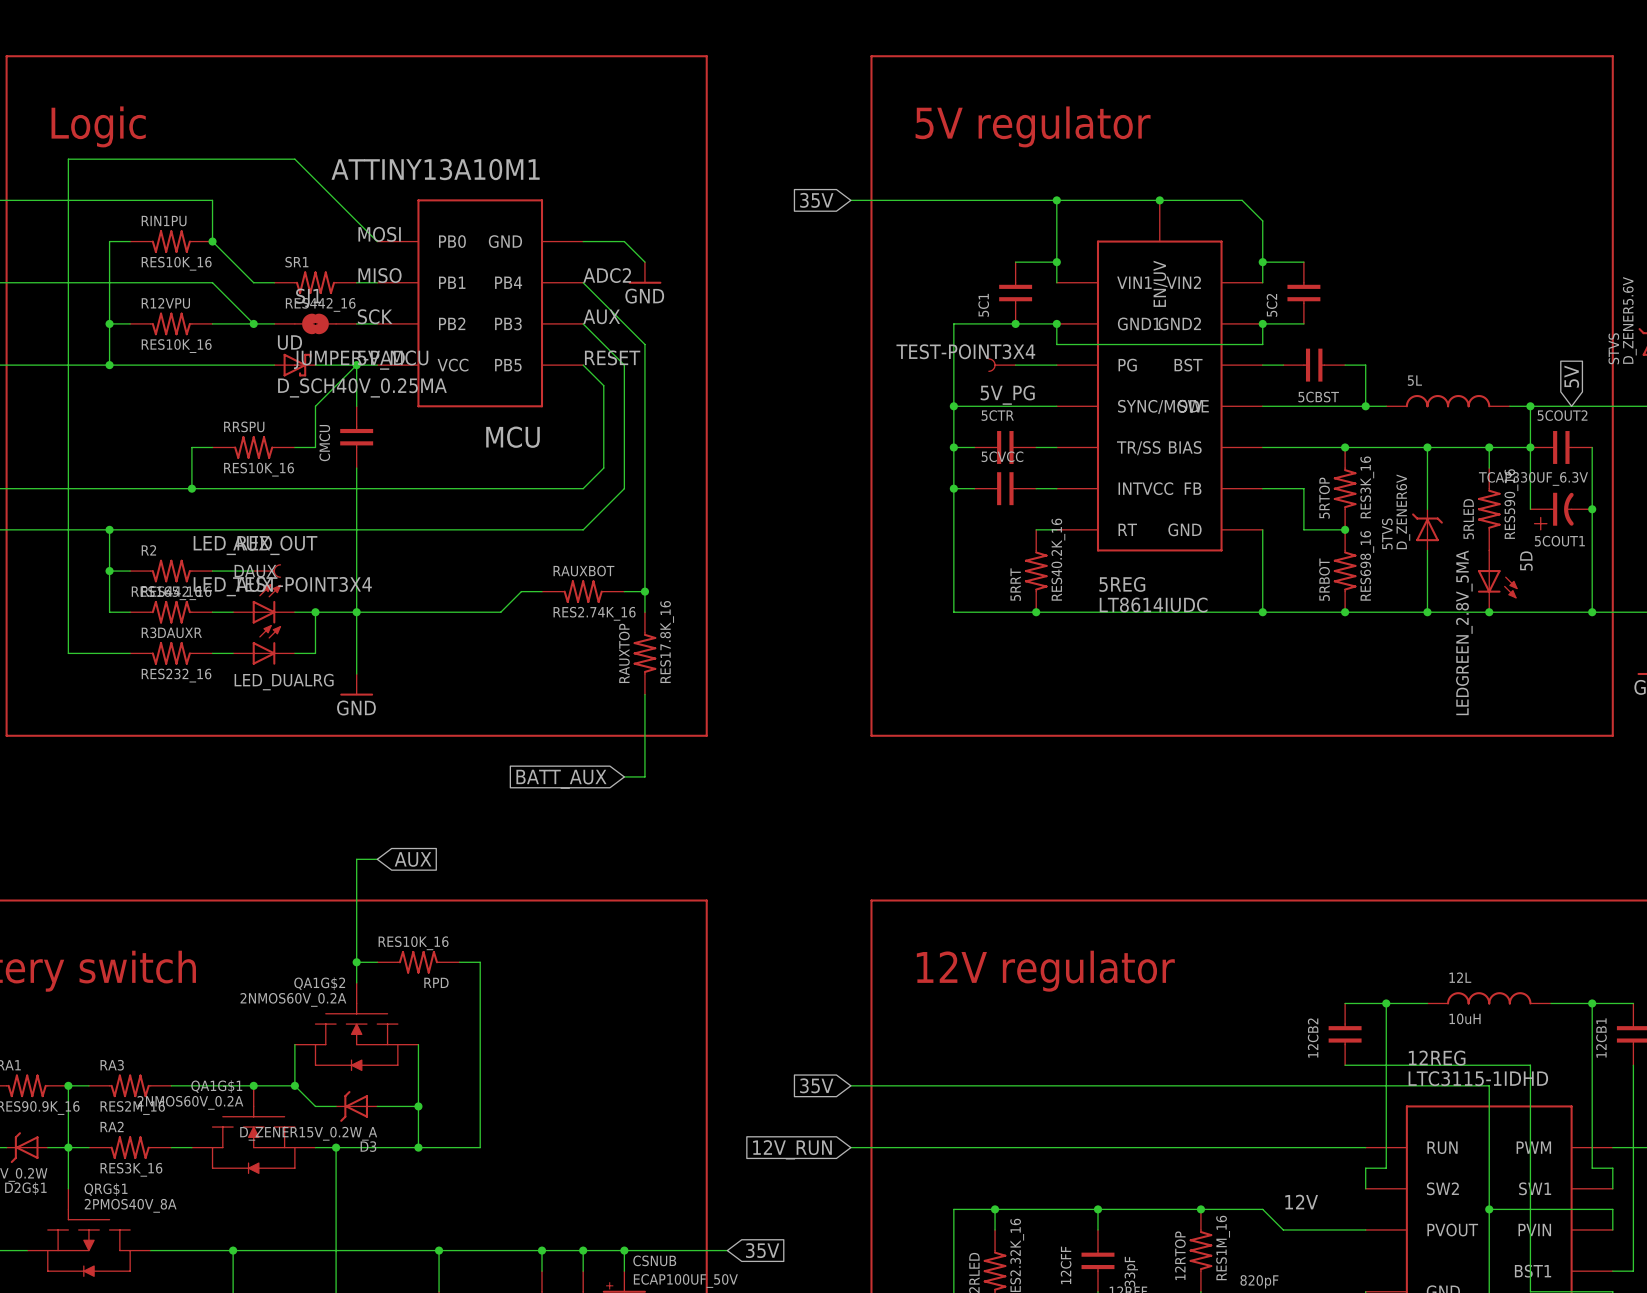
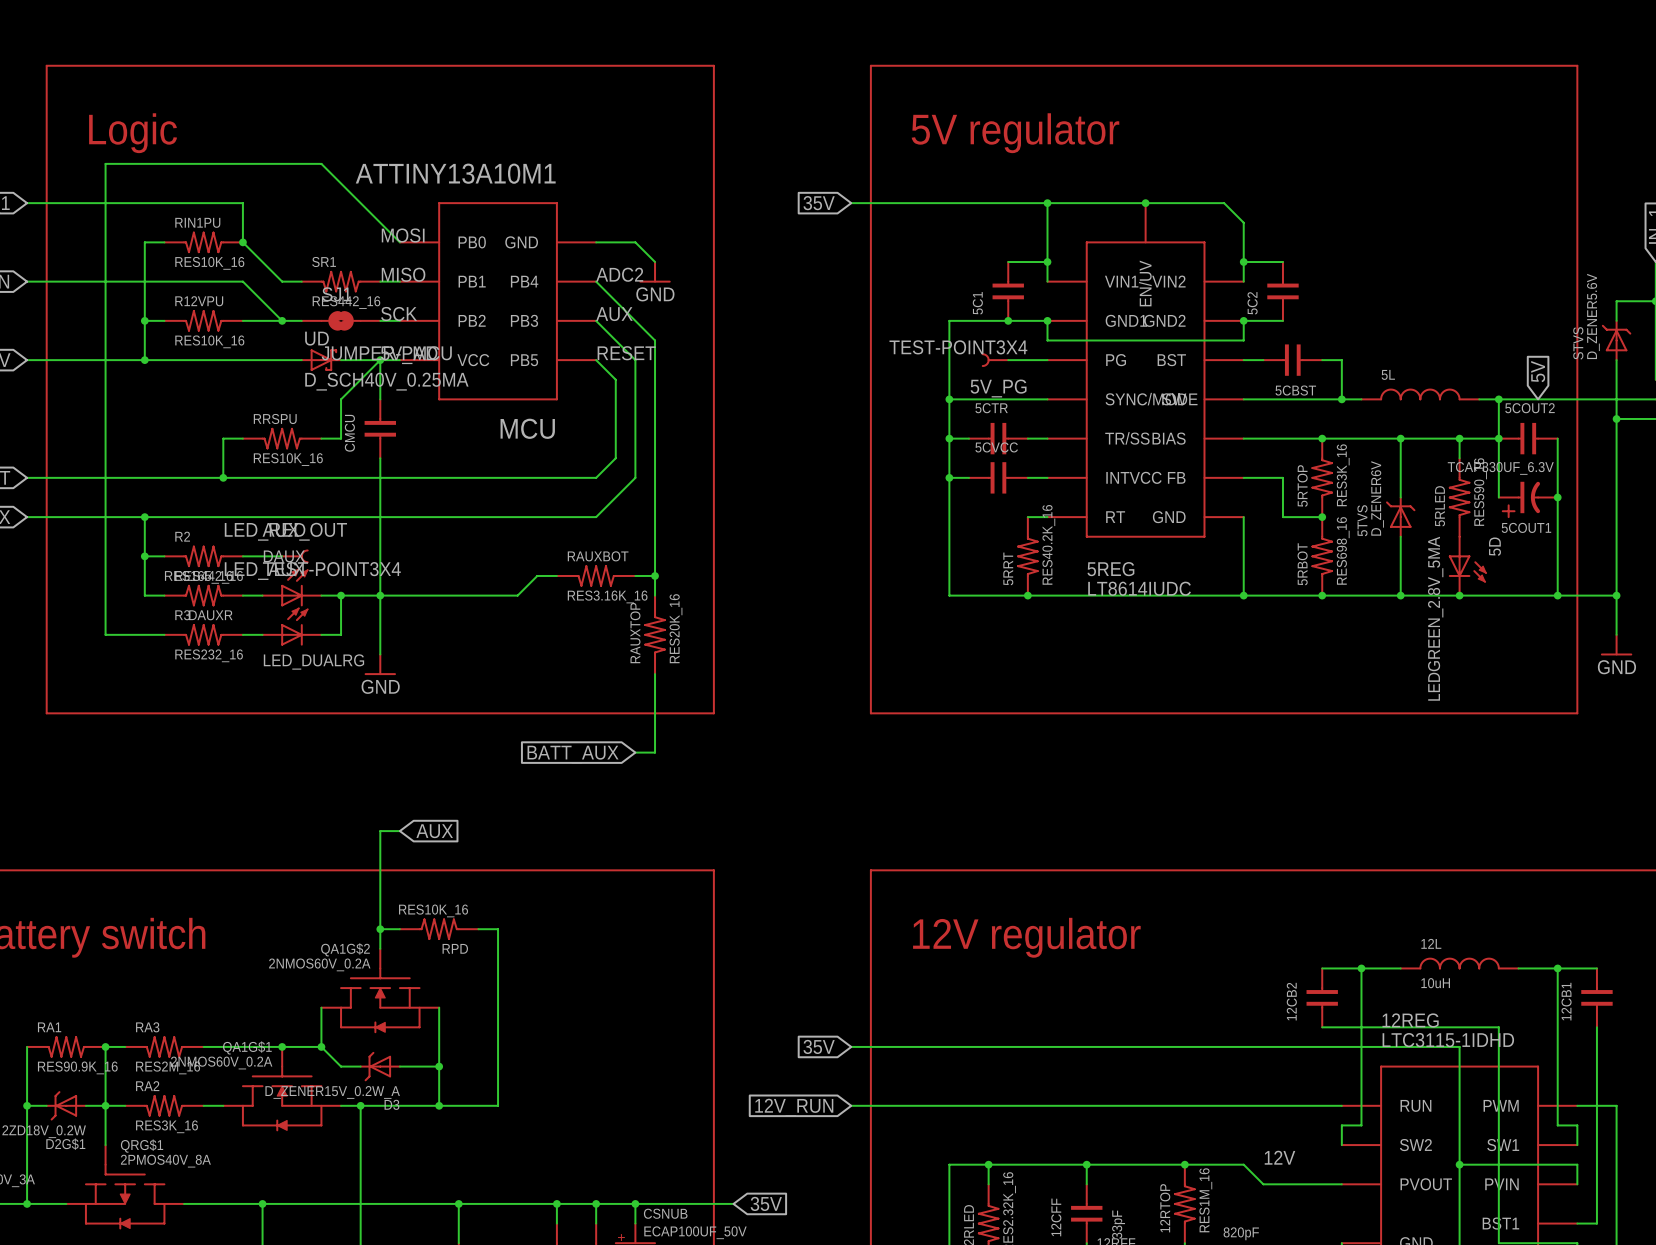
RAUXBOT value: RES2.74K_16 (594, 613) -> RES3.16K_16 (607, 596)
RAUXTOP value: RES17.8K_16 (667, 642) -> RES20K_16 (675, 628)

